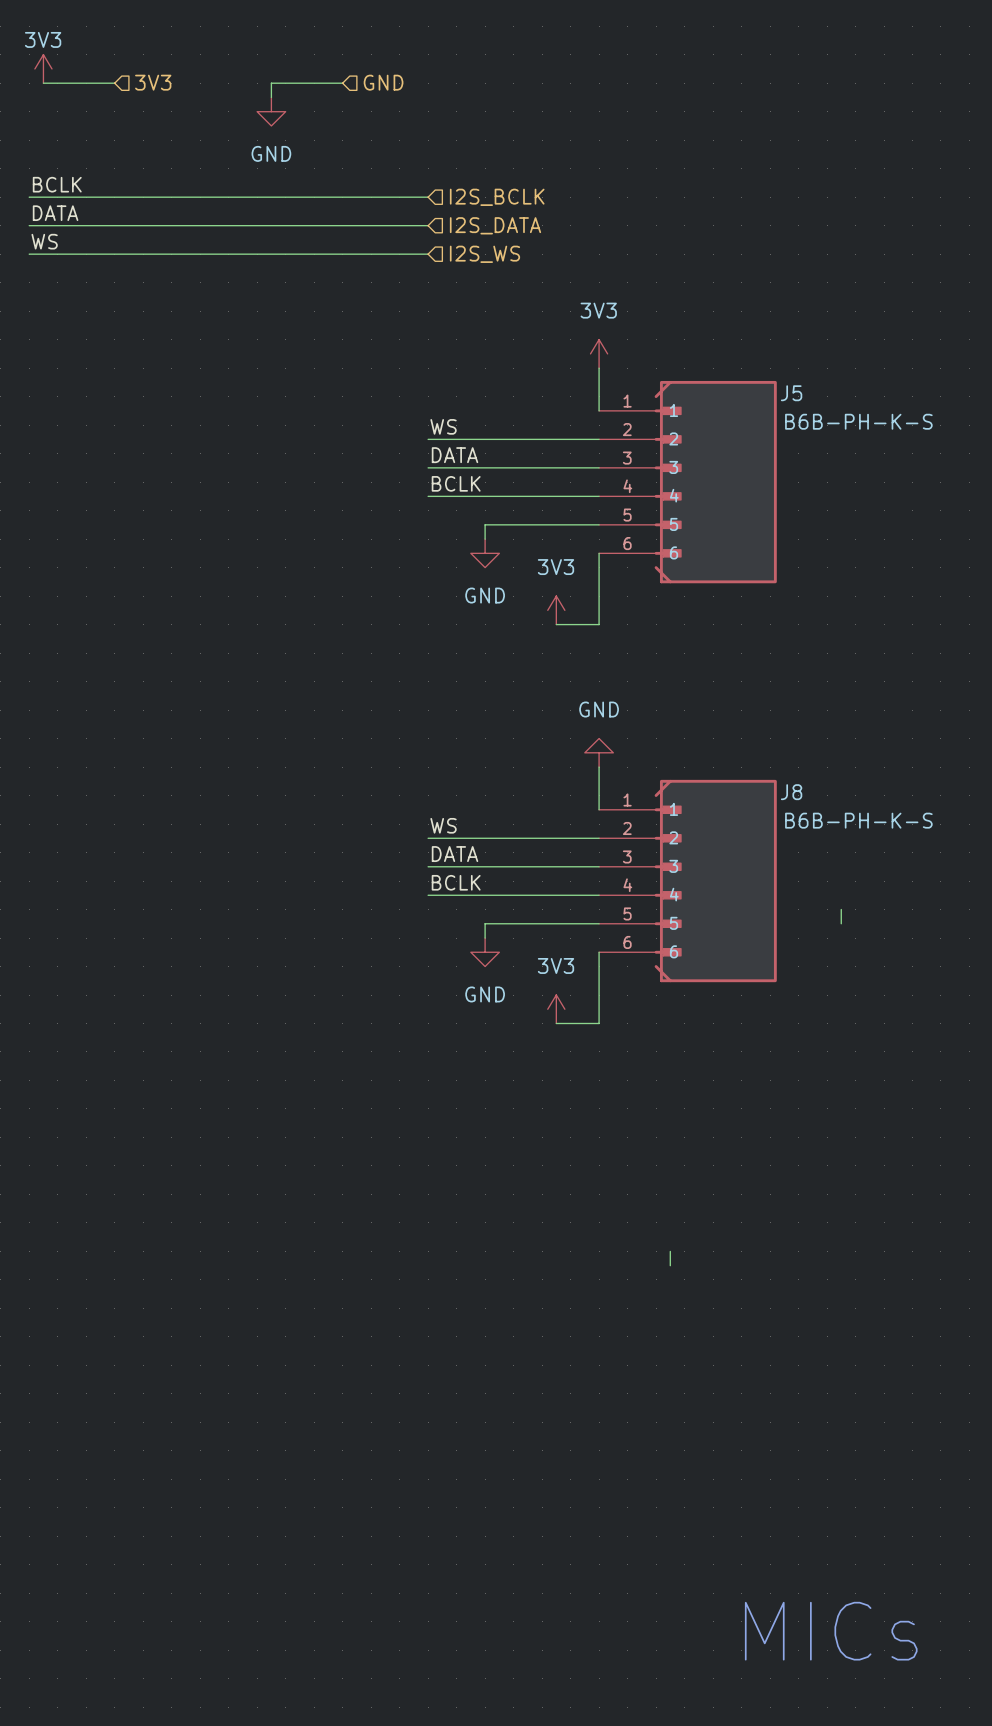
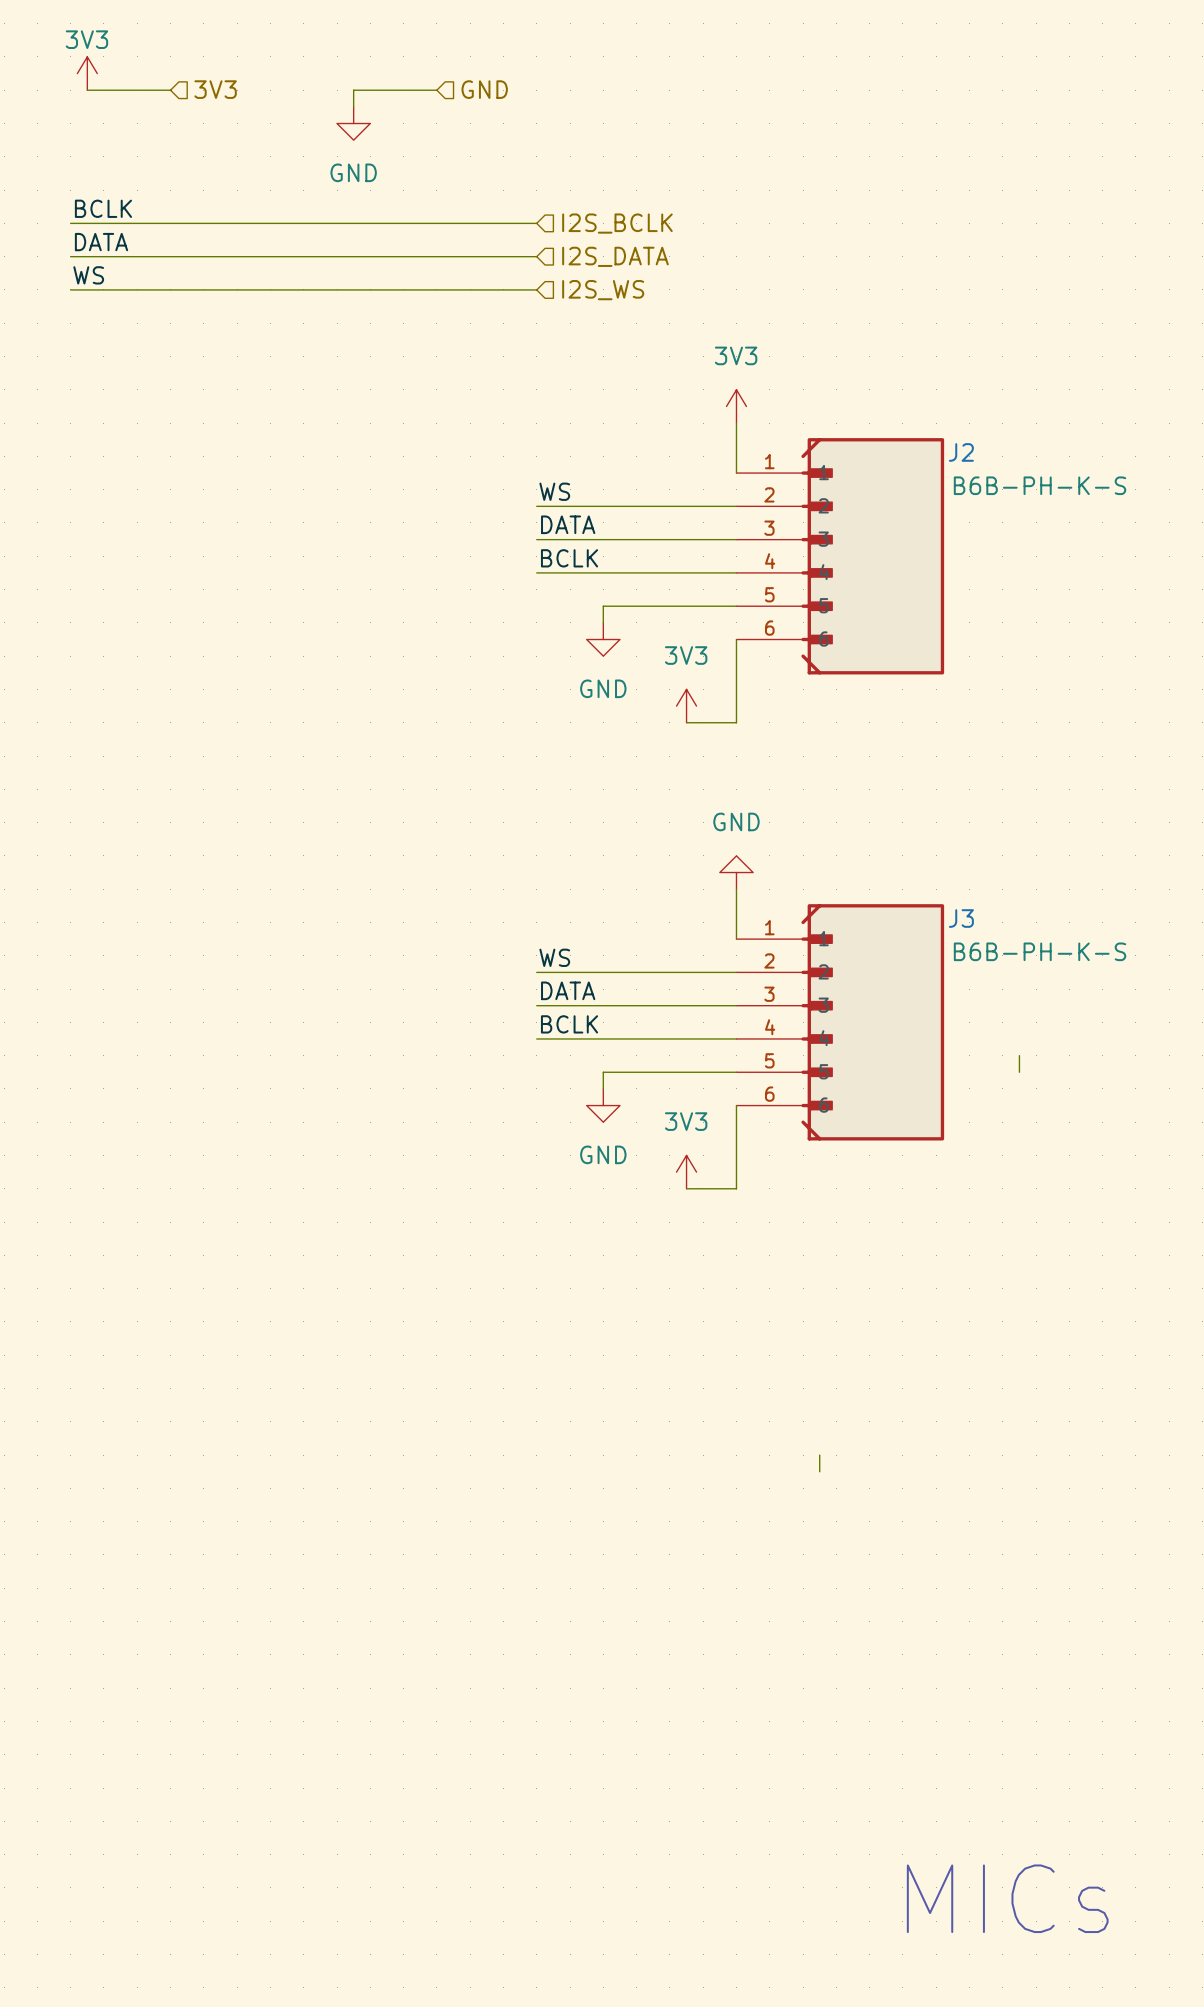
J5 name: J5 (791, 393) -> J2 (961, 452)
J8 name: J8 (791, 792) -> J3 (961, 918)

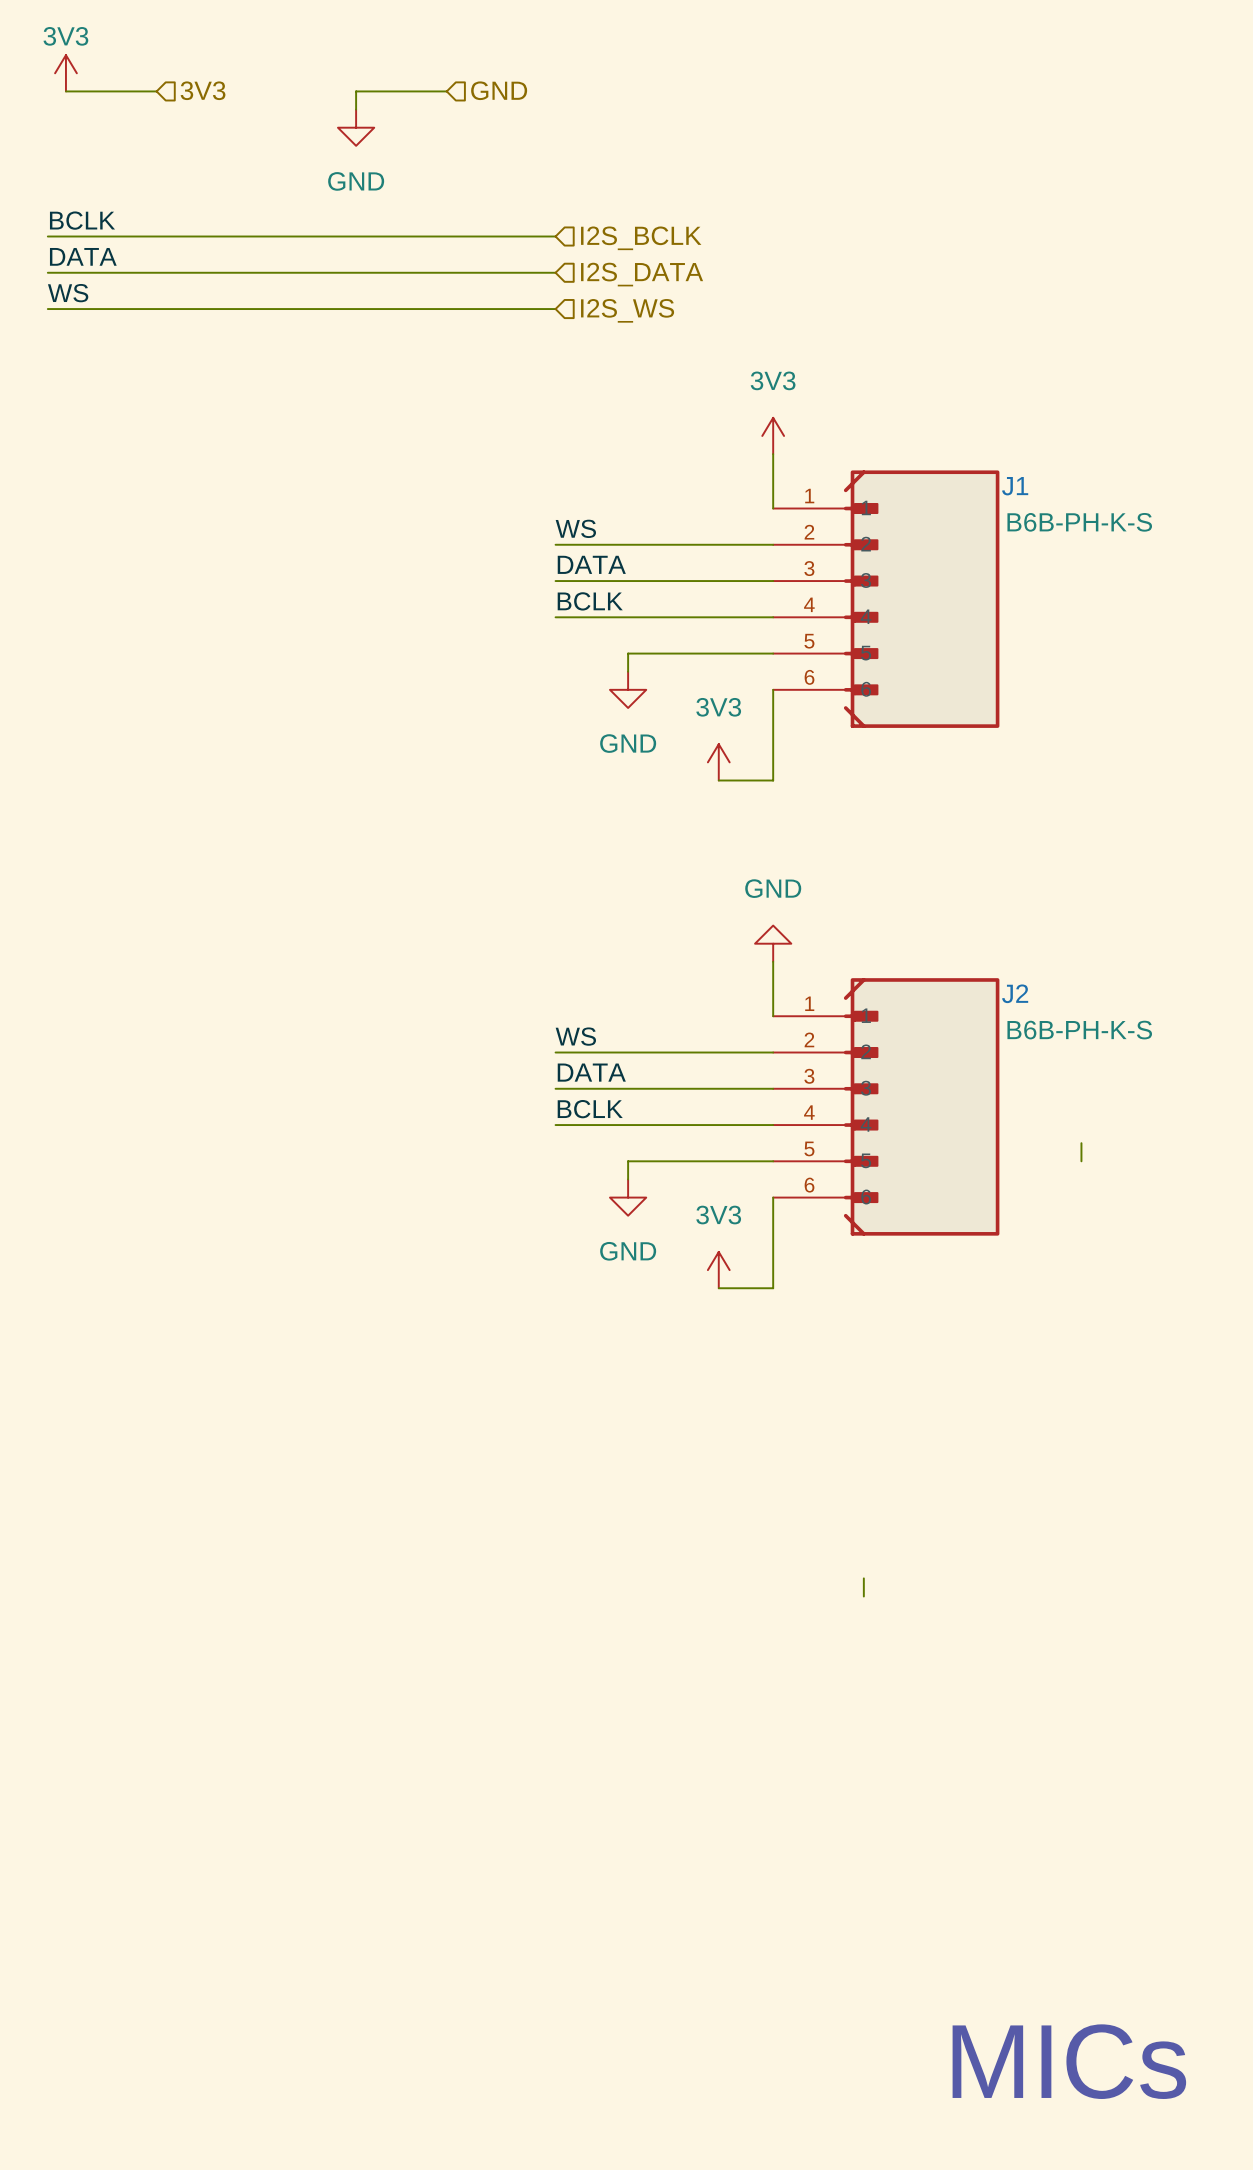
J2 name: J2 (961, 452) -> J1 (1015, 486)
J3 name: J3 (961, 918) -> J2 (1015, 993)

